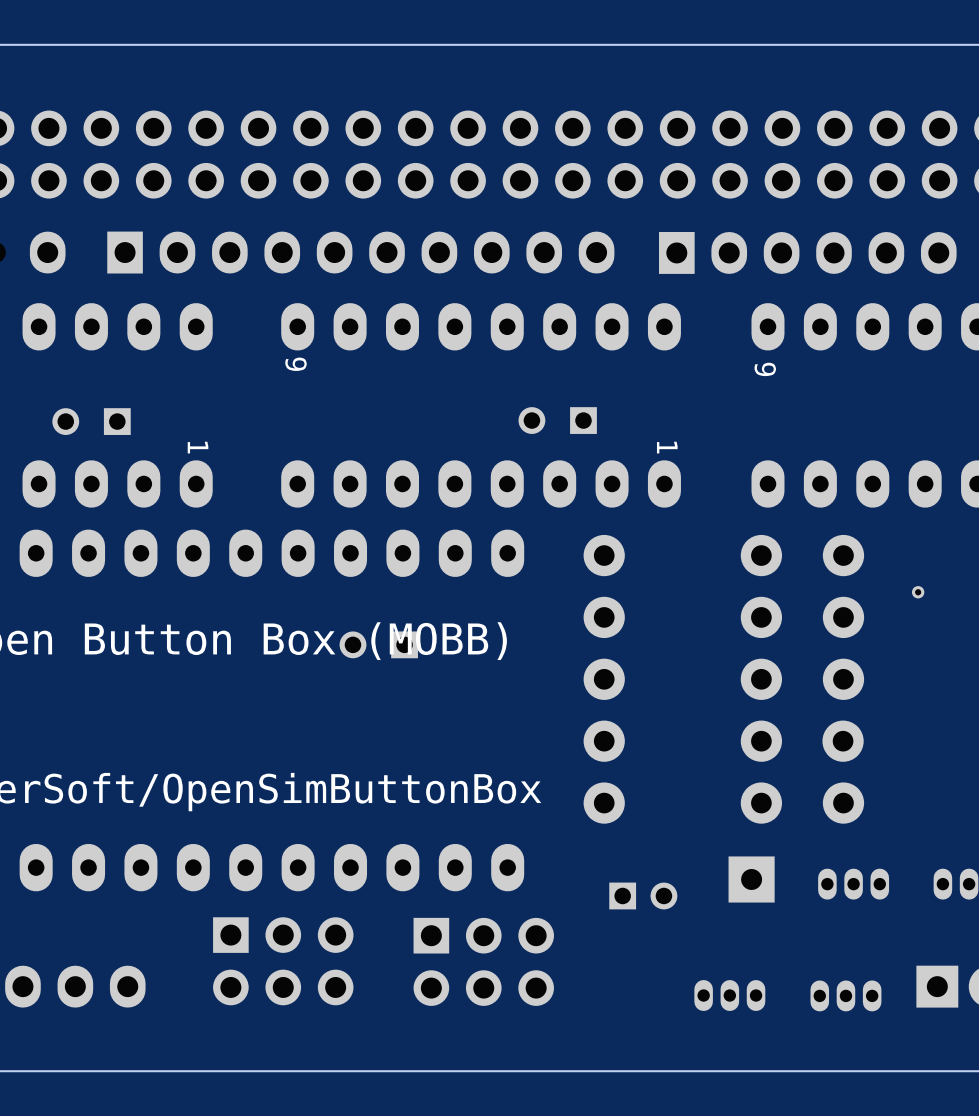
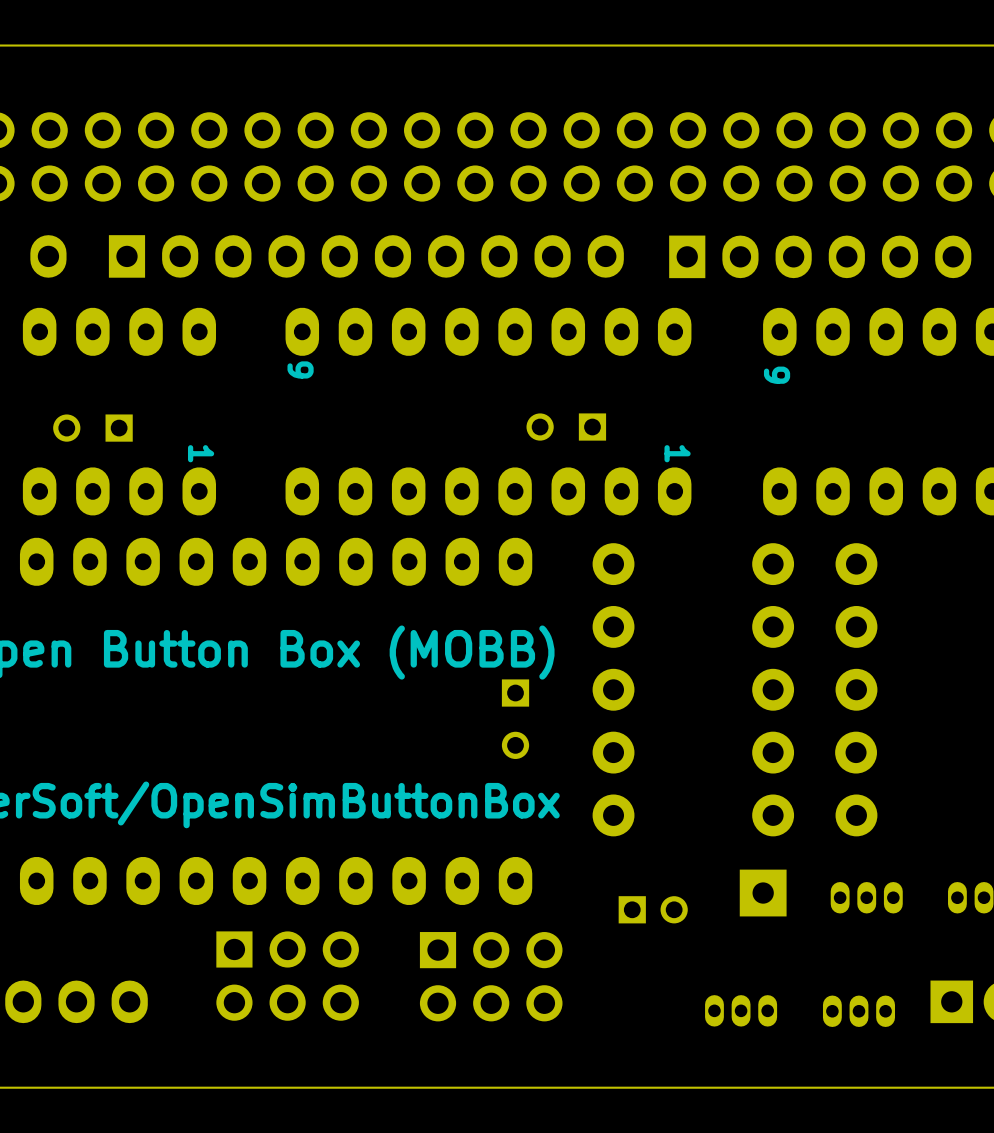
part: (918, 592) -> none
part rotation: 0° (378, 644) -> 90° counterclockwise (515, 719)
part position: (378, 644) -> (515, 719)

